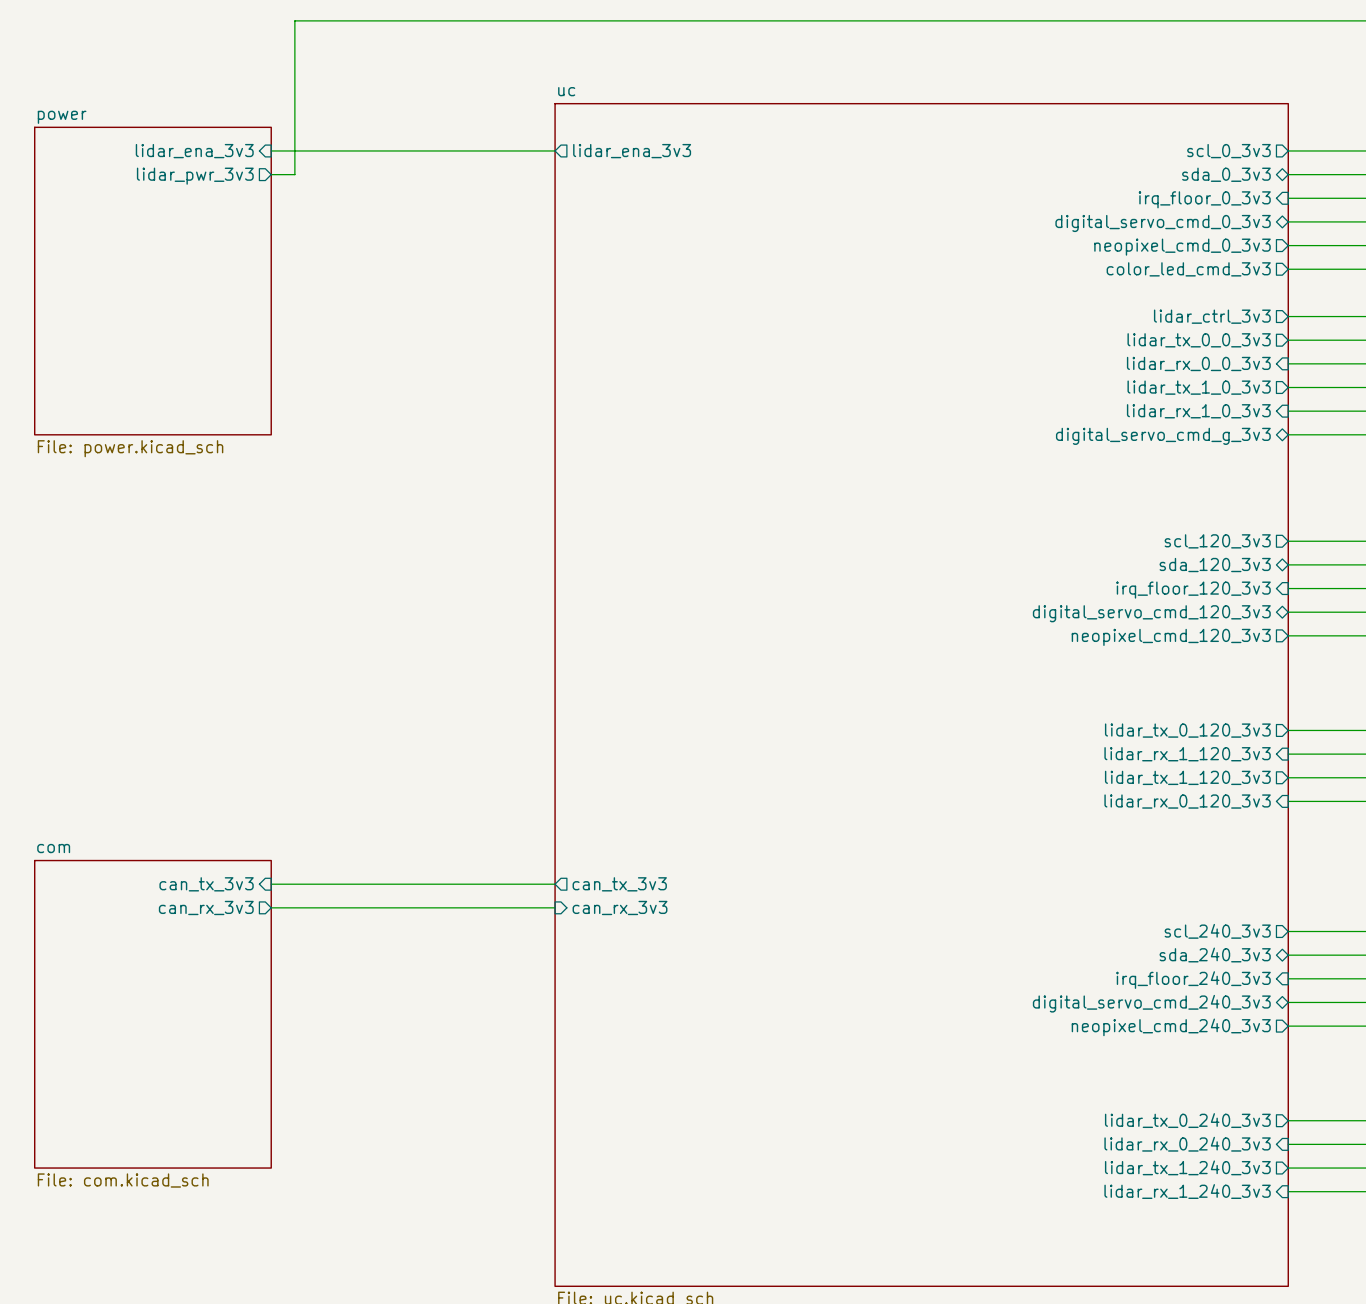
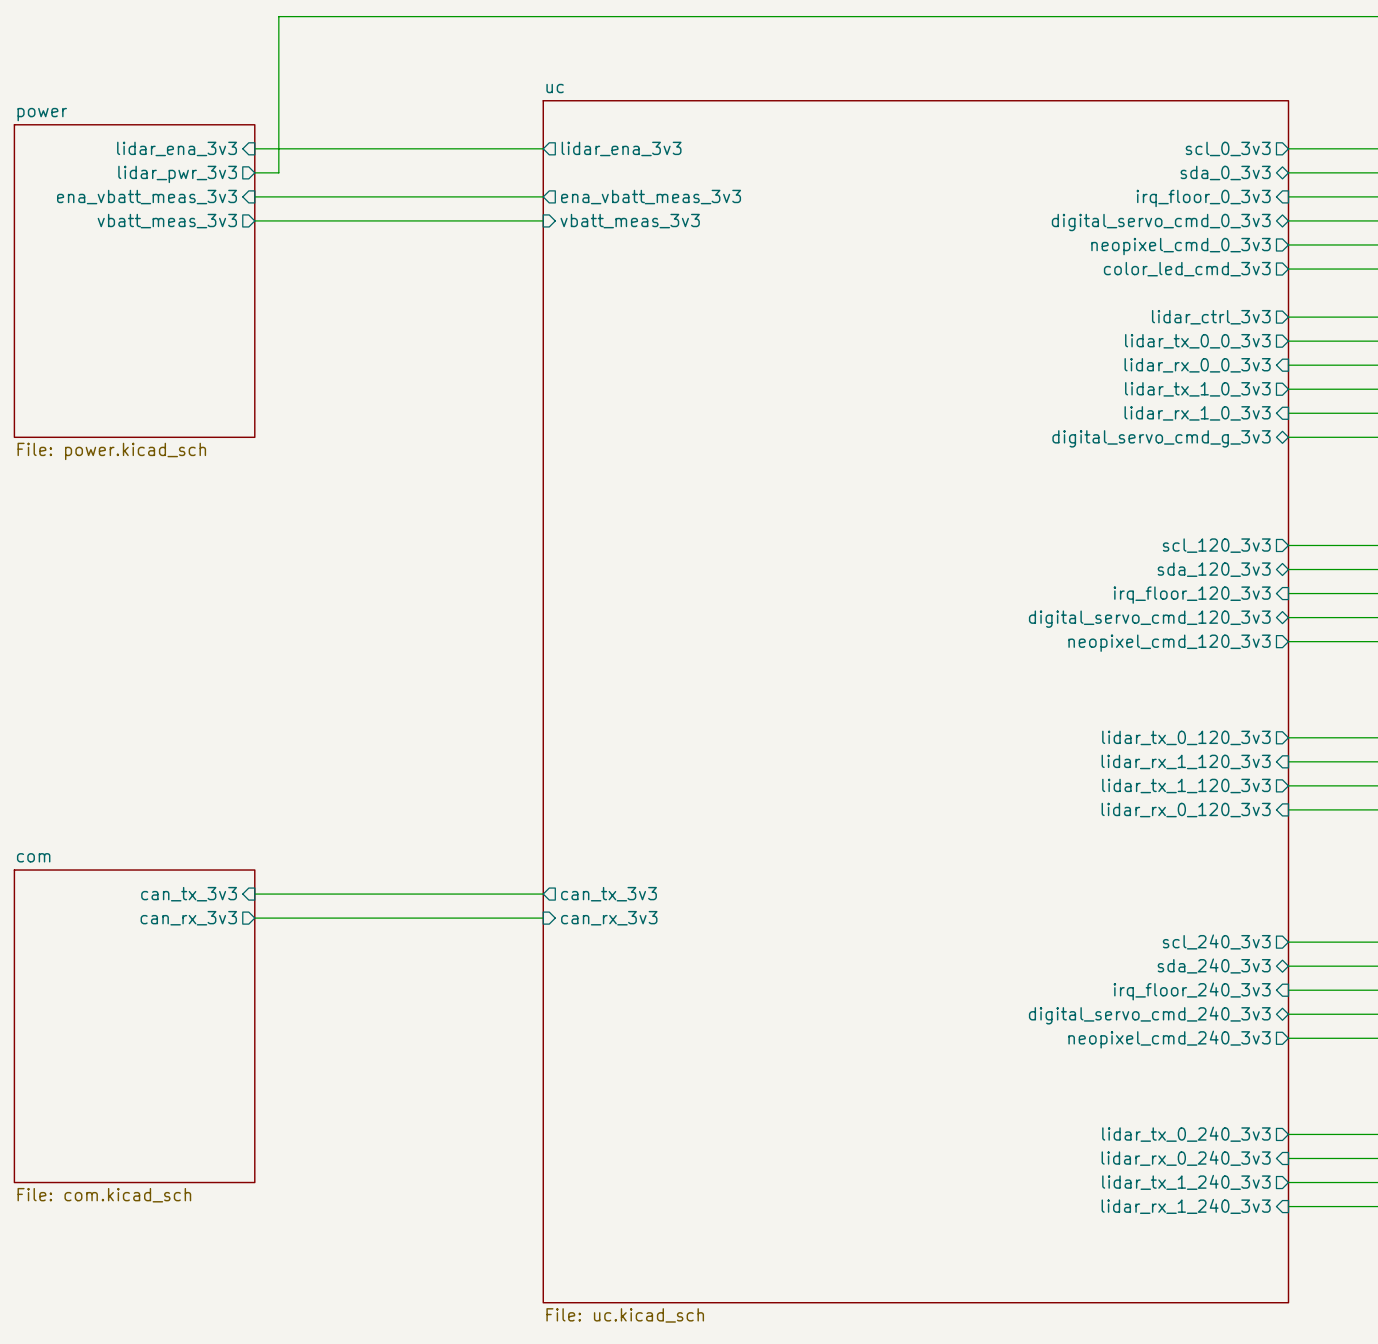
sheet pin: none -> ena_vbatt_meas_3v3 (147, 197)
wire: none -> (254, 196) (543, 196)
sheet pin: none -> ena_vbatt_meas_3v3 (651, 197)
wire: none -> (254, 220) (543, 220)
sheet pin: none -> vbatt_meas_3v3 (167, 221)
sheet pin: none -> vbatt_meas_3v3 (630, 221)

